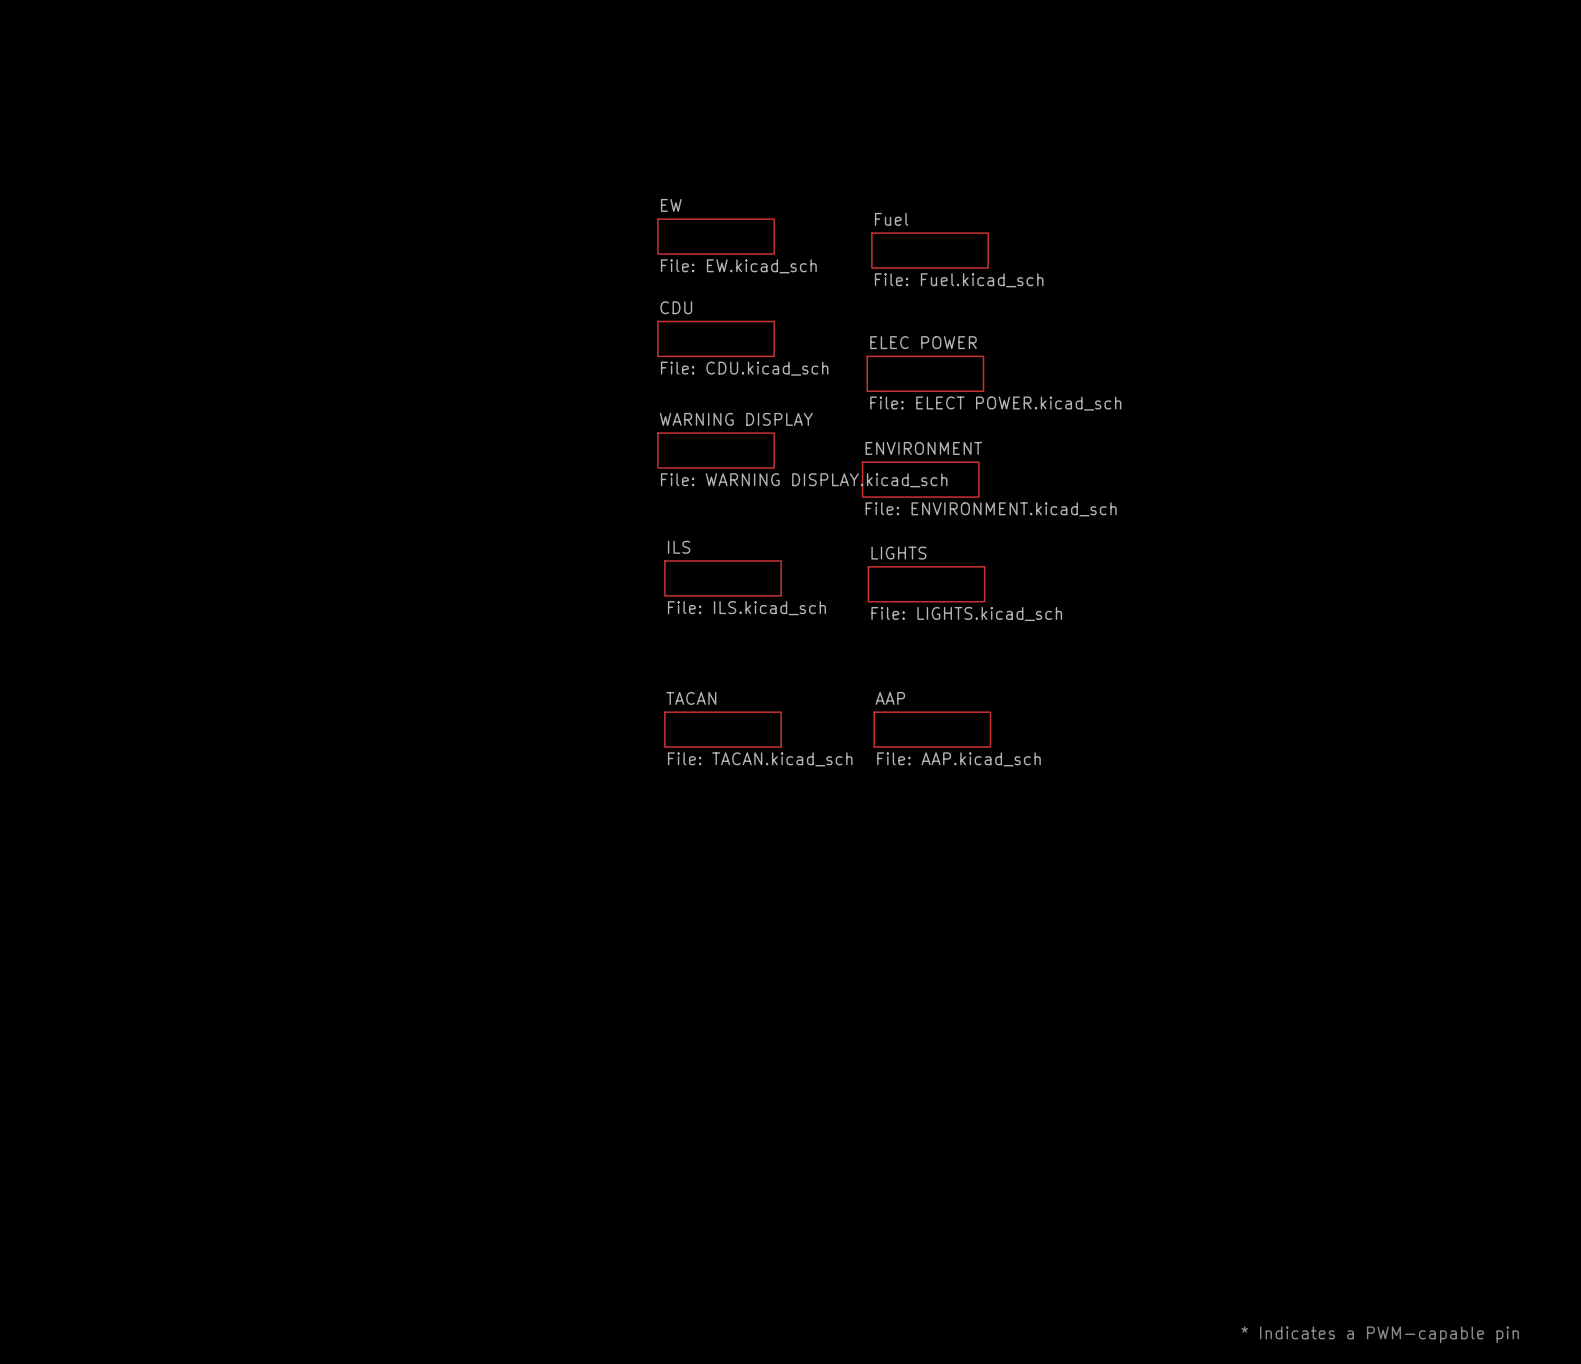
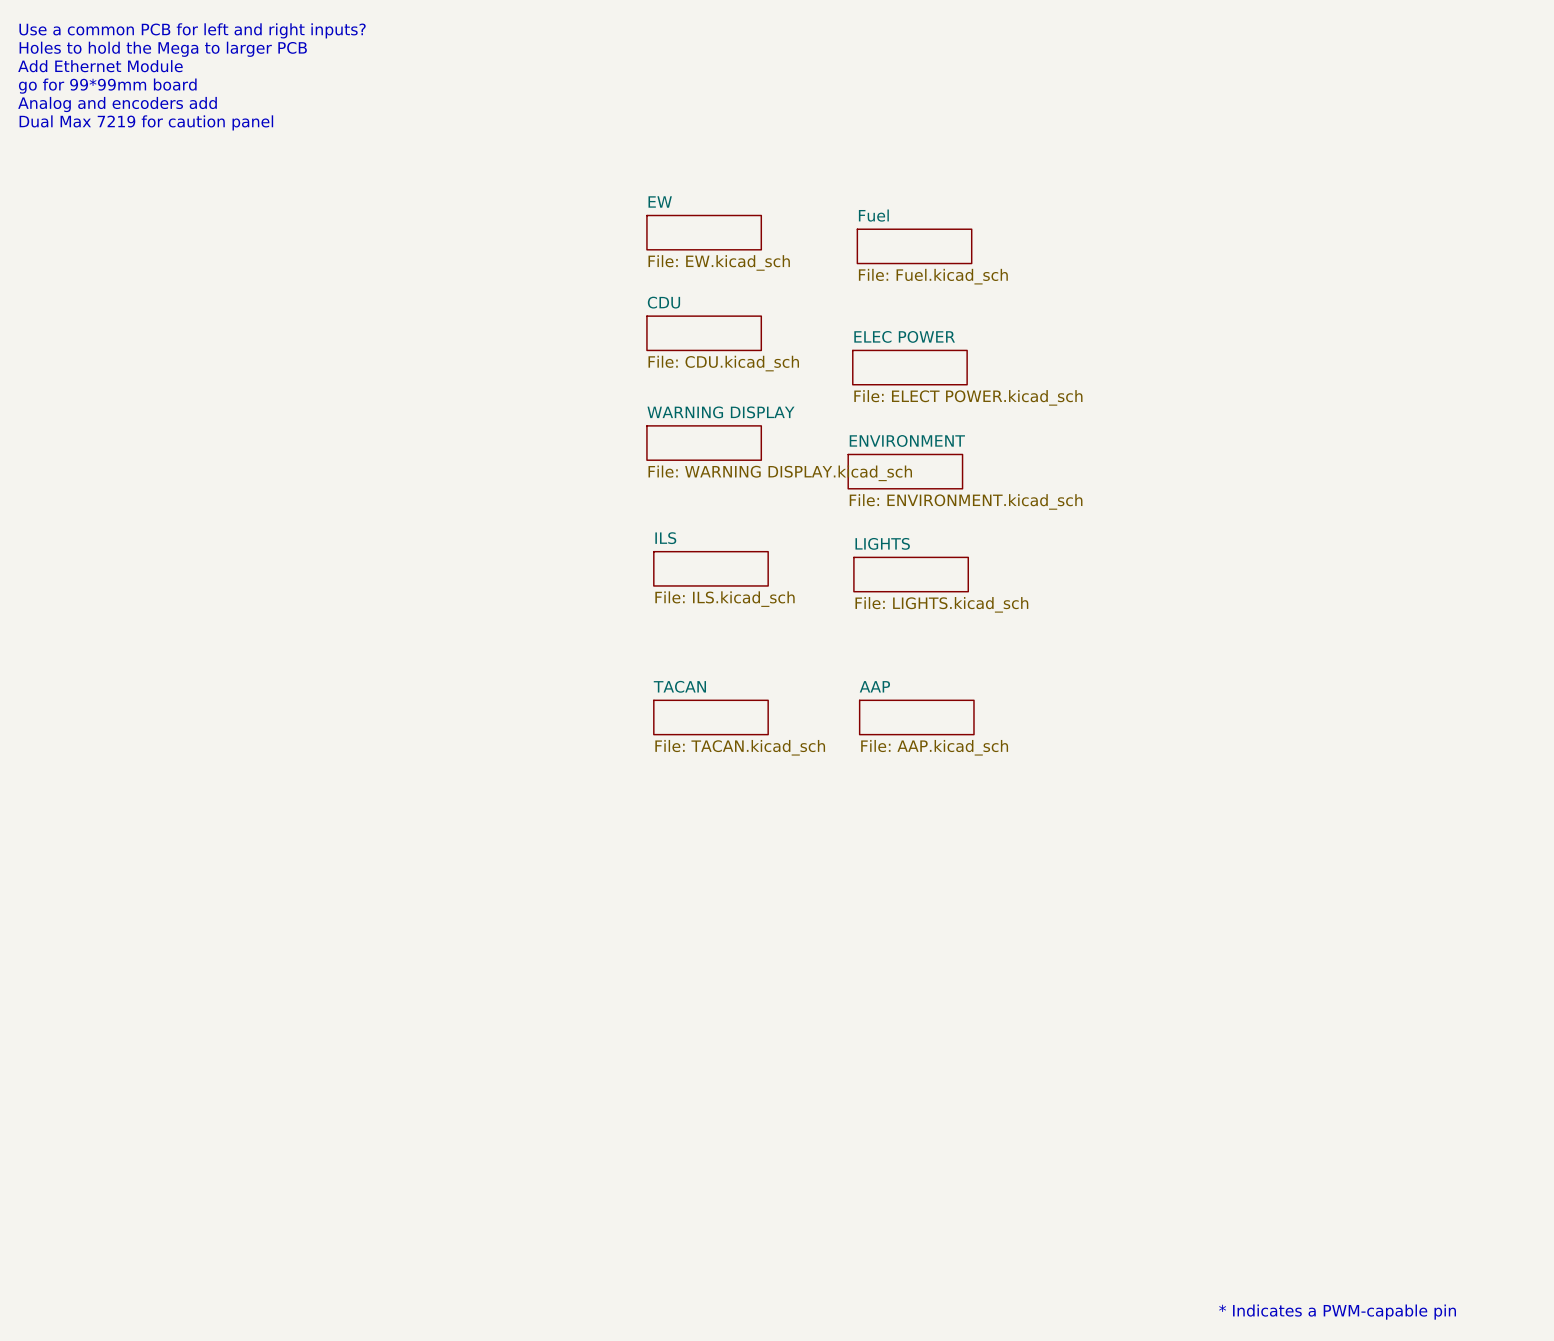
text: none -> Use a common PCB for left and right inputs? (192, 30)
text: none -> Holes to hold the Mega to larger PCB (163, 49)
text: none -> Add Ethernet Module (100, 66)
text: none -> go for 99*99mm board (107, 86)
text: none -> Analog and encoders add (117, 104)
text: none -> Dual Max 7219 for caution panel (146, 122)

